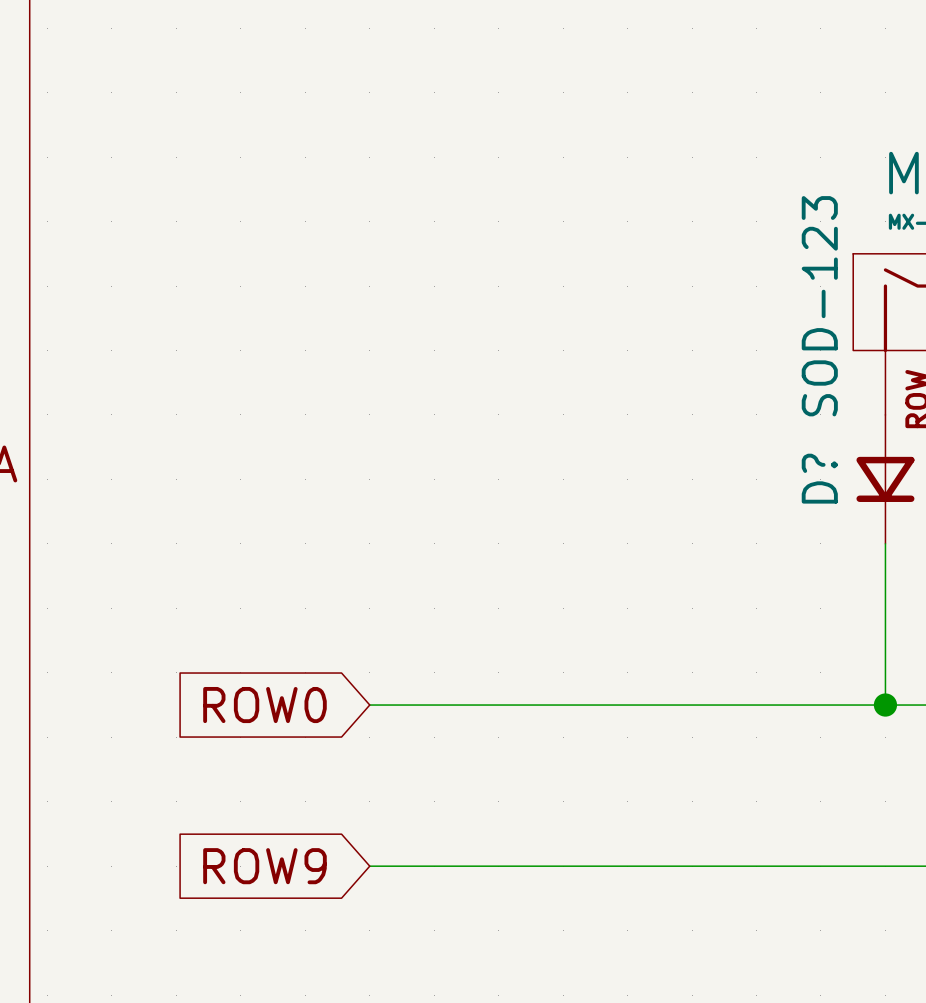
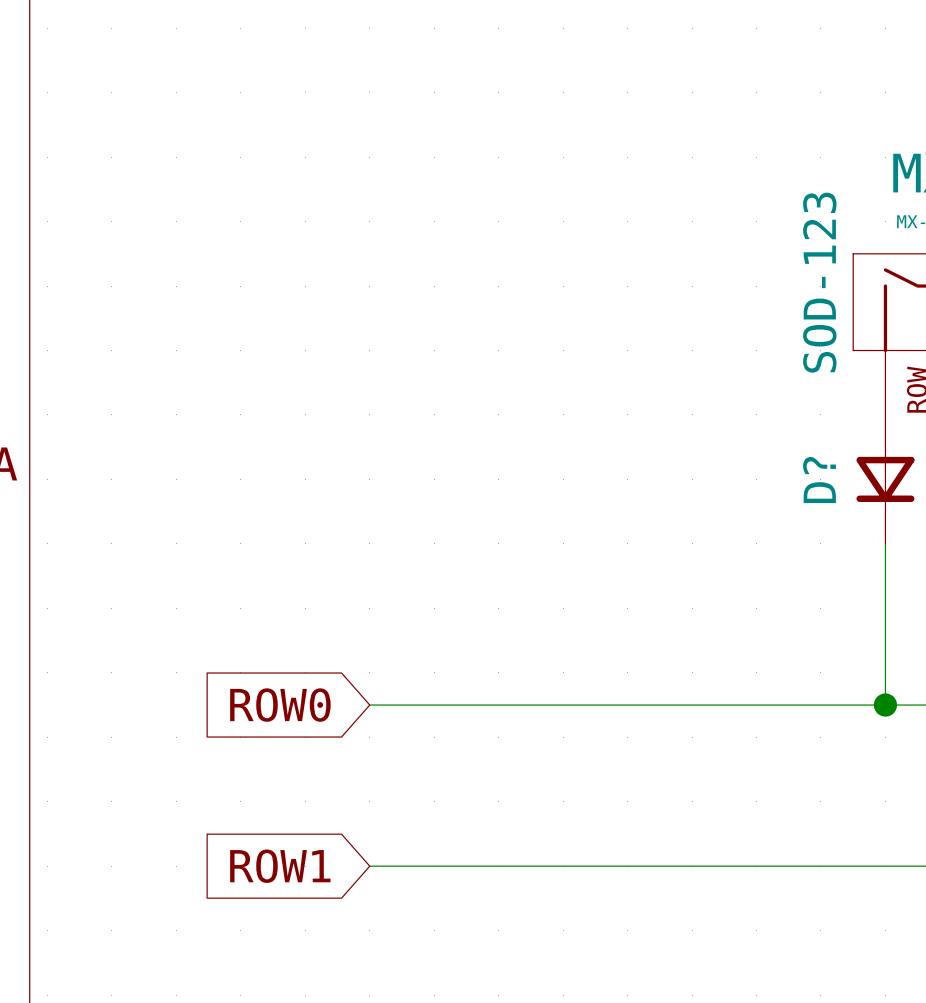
global label: ROW9 (264, 866) -> ROW1 (280, 866)

